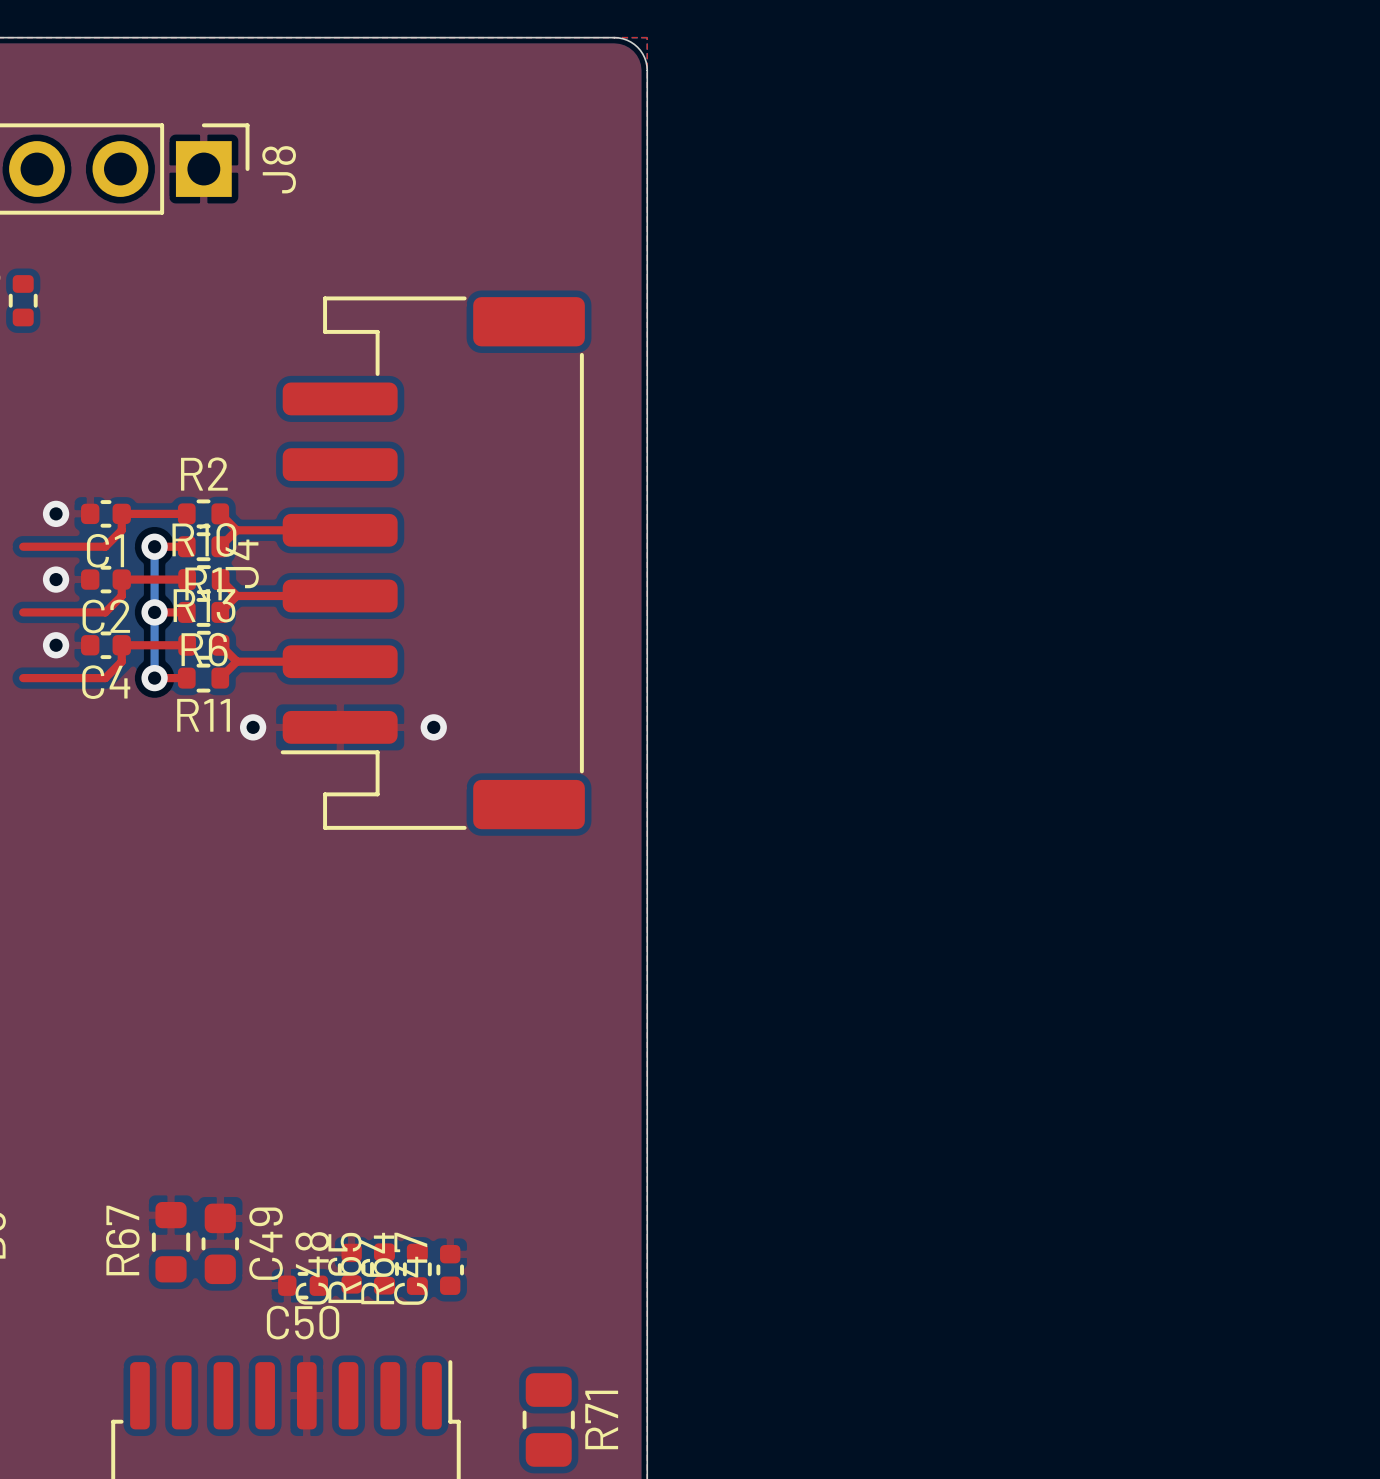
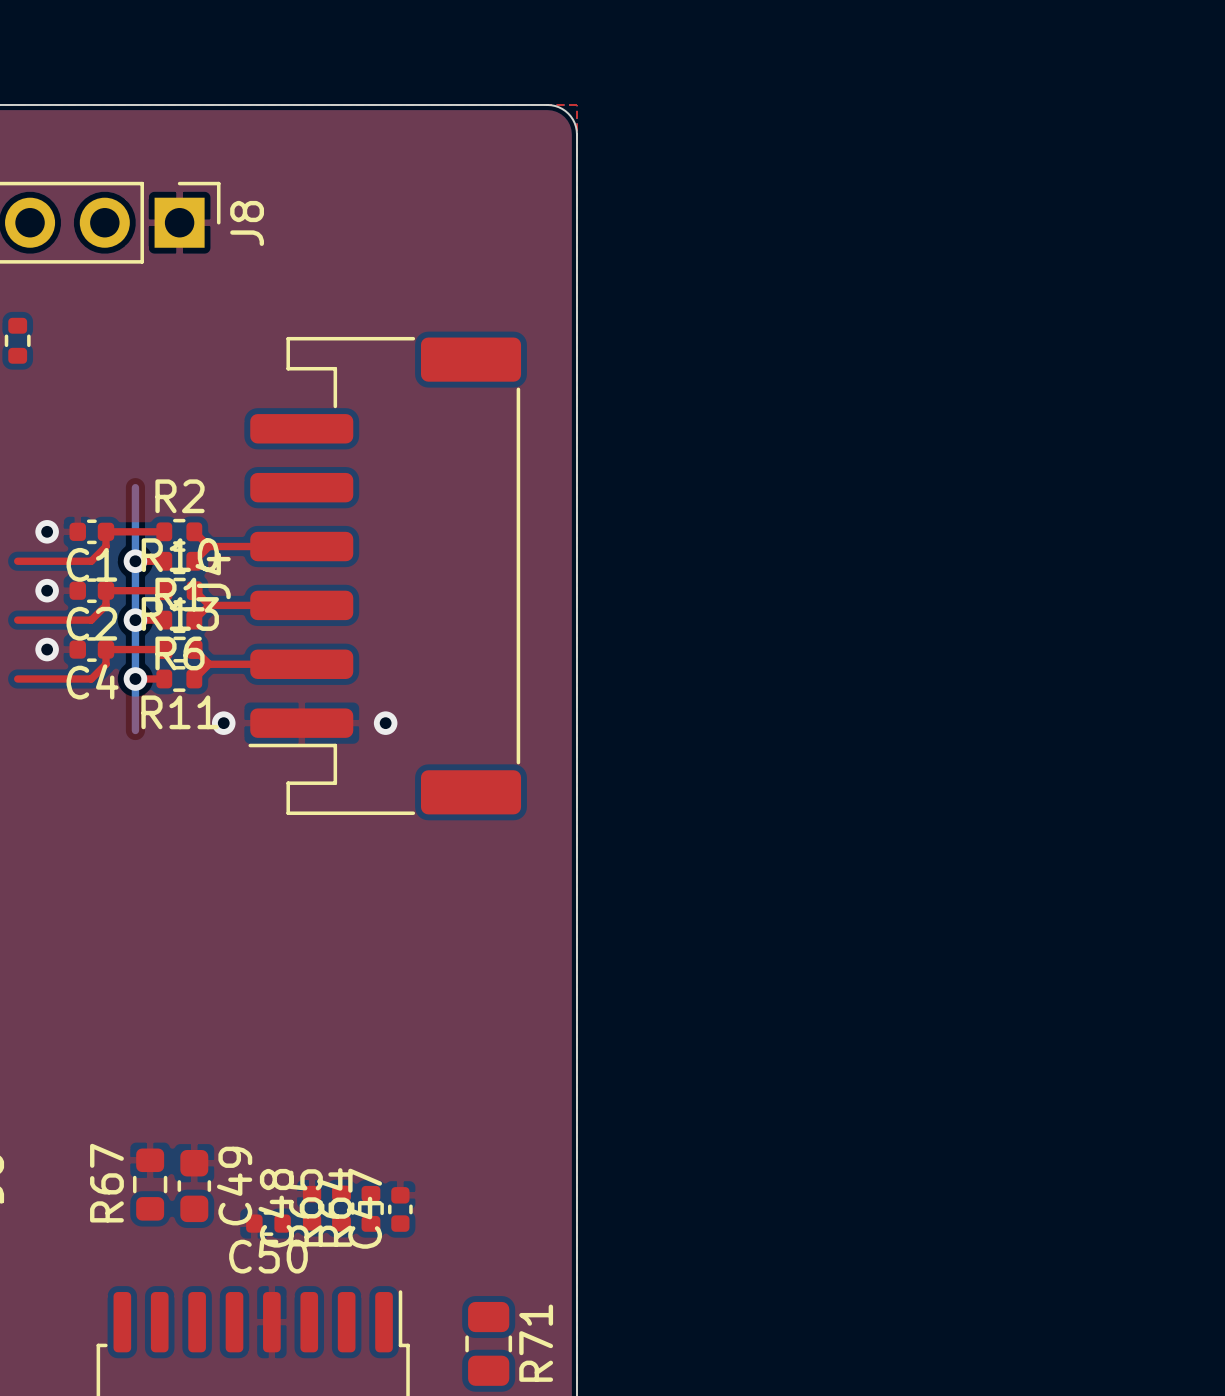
bottom track: none -> (135, 487) (135, 561)
bottom track: none -> (135, 678) (135, 730)

